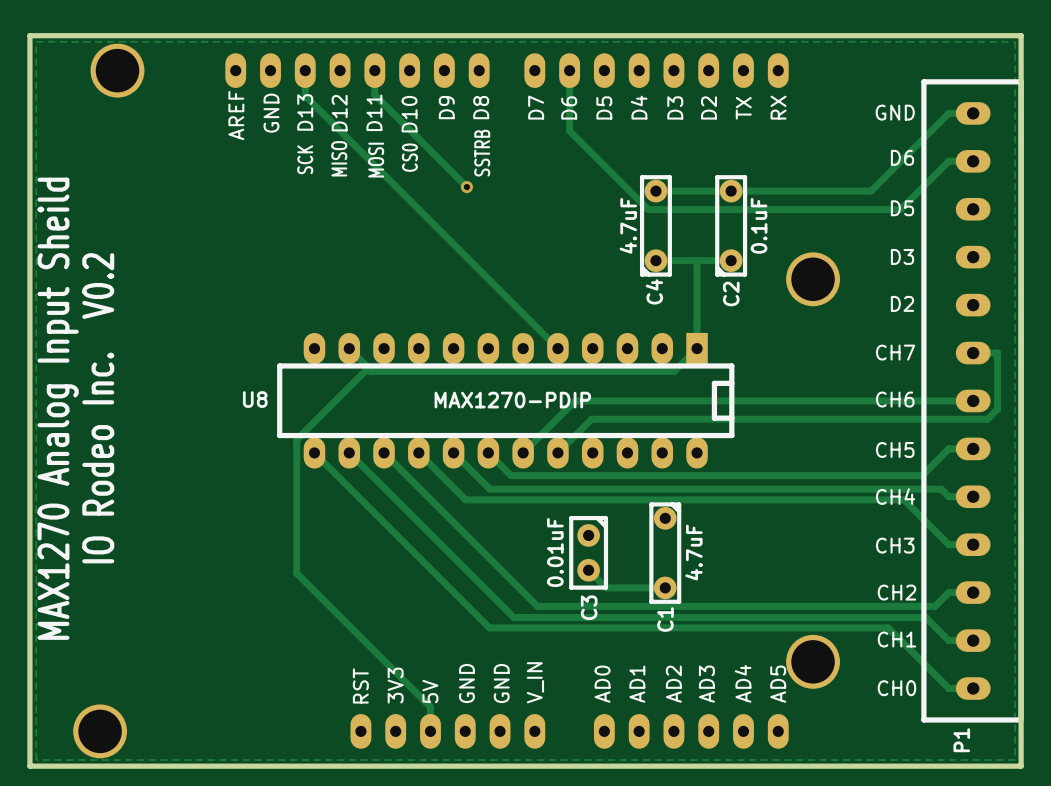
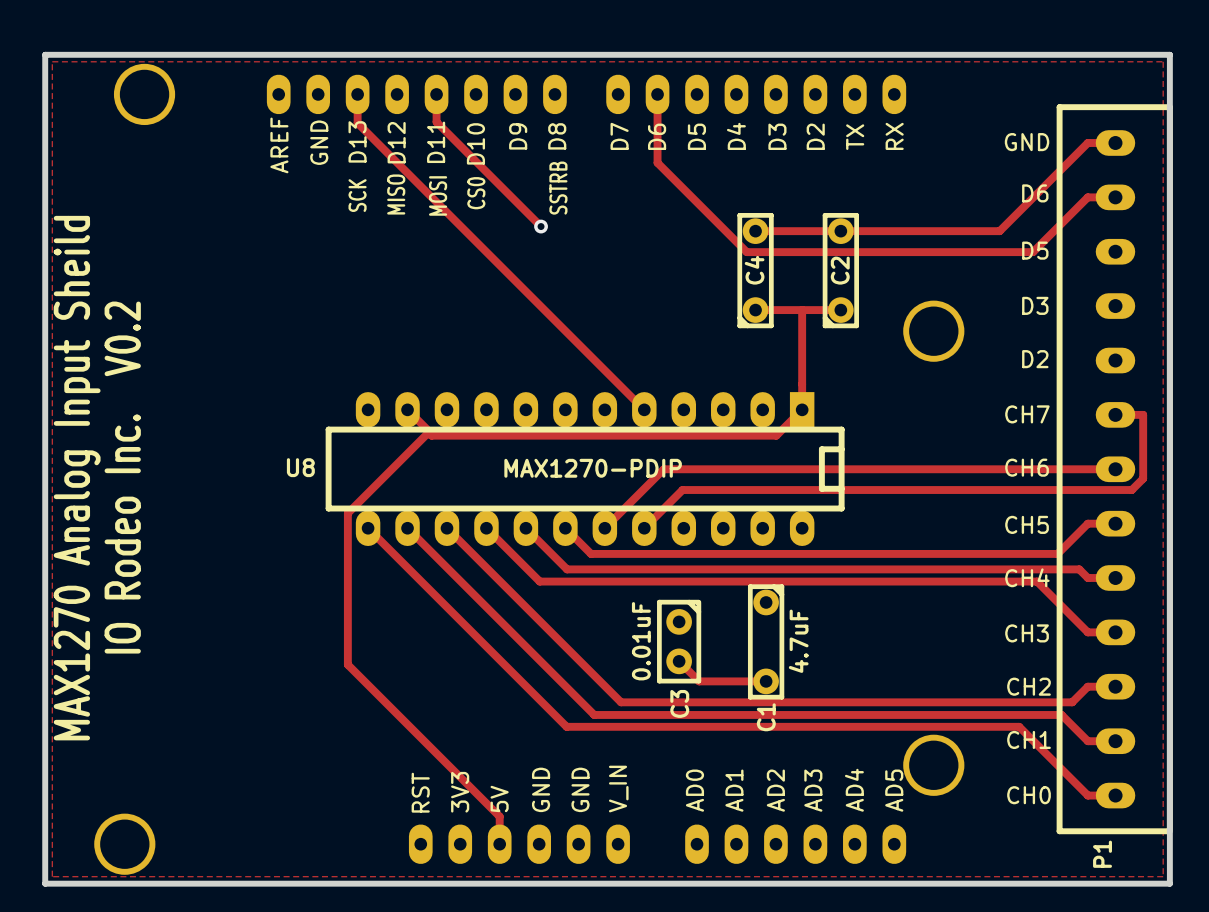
C4 value: 4.7uF (628, 225) -> none
C2 value: 0.1uF (759, 225) -> none
C4 name position: C4 (654, 291) -> C4 (754, 270)
C2 name position: C2 (731, 293) -> C2 (840, 270)

